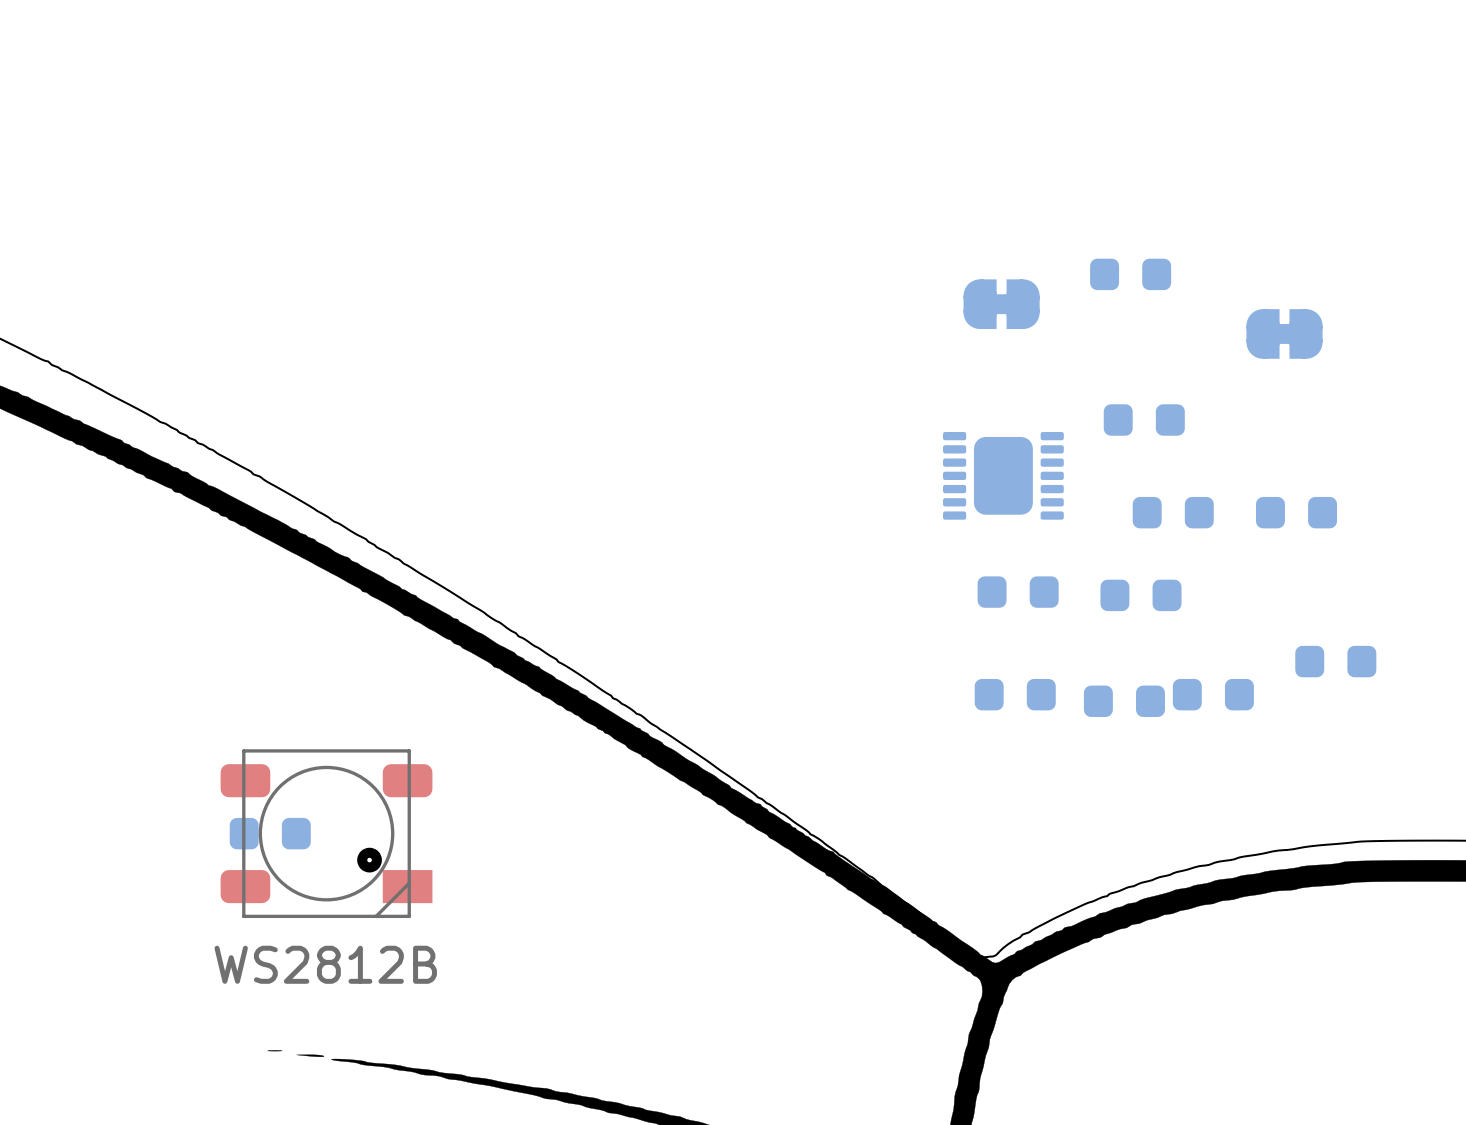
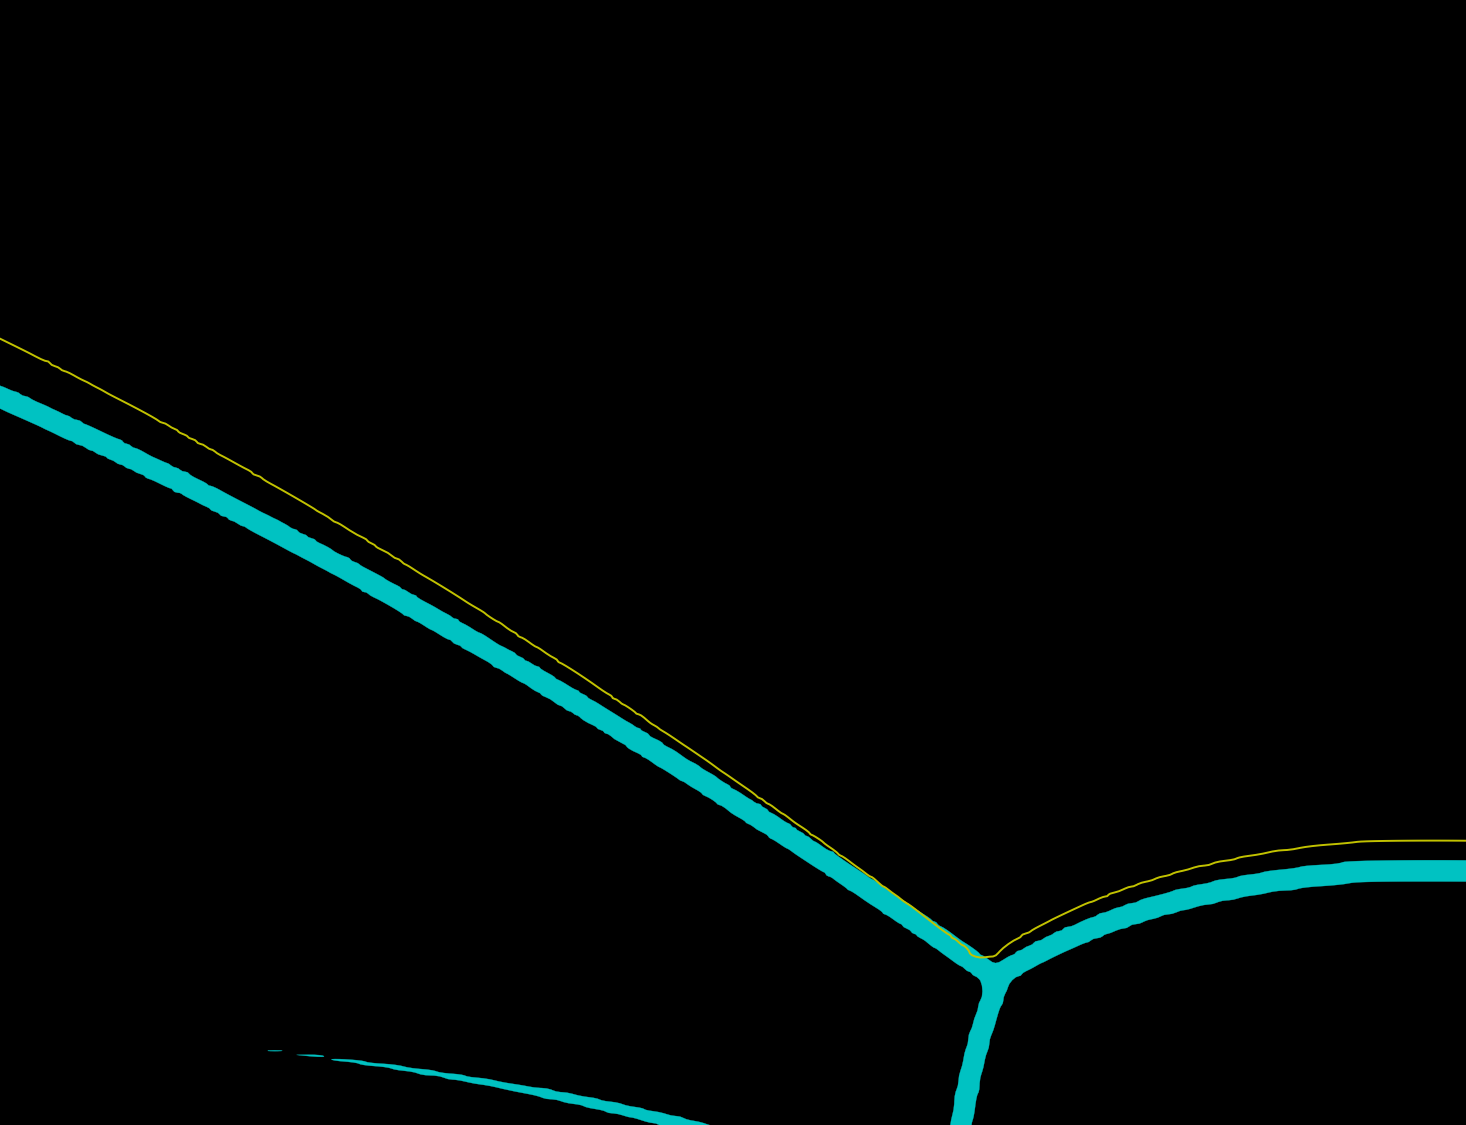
part: (1130, 274) -> none
part: (1001, 304) -> none
part: (1284, 333) -> none
part: (1144, 420) -> none
part: (1003, 475) -> none
part: (1173, 512) -> none
part: (1296, 512) -> none
part: (1018, 592) -> none
part: (1140, 595) -> none
part: (1335, 661) -> none
part: (1015, 694) -> none
part: (1213, 694) -> none
part: (1124, 701) -> none
part: (270, 833) -> none
part: WS2812B (326, 833) -> none

